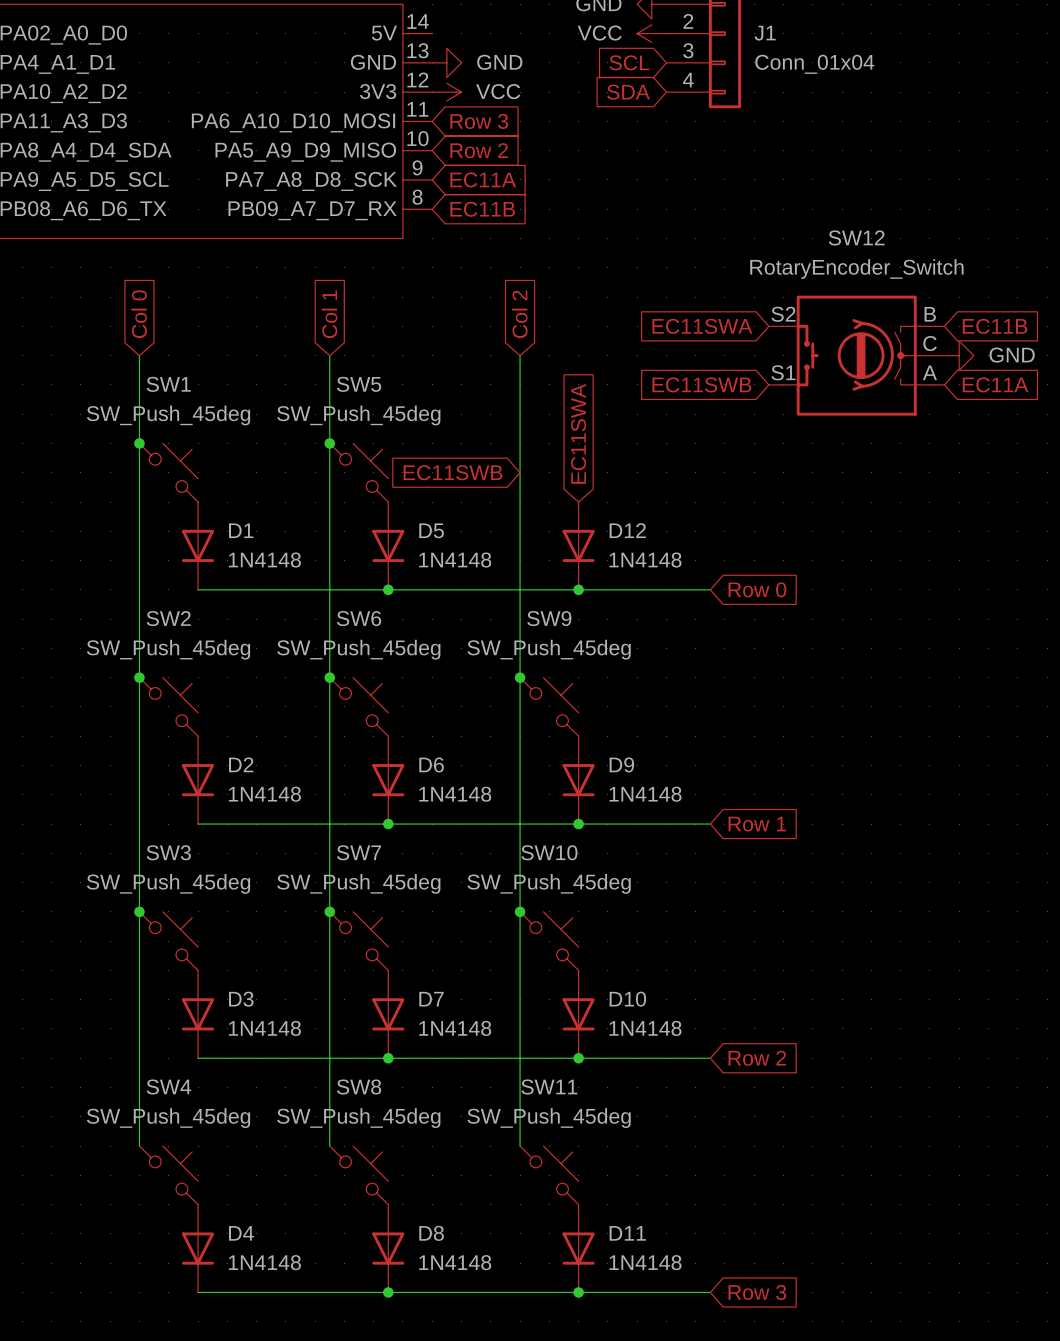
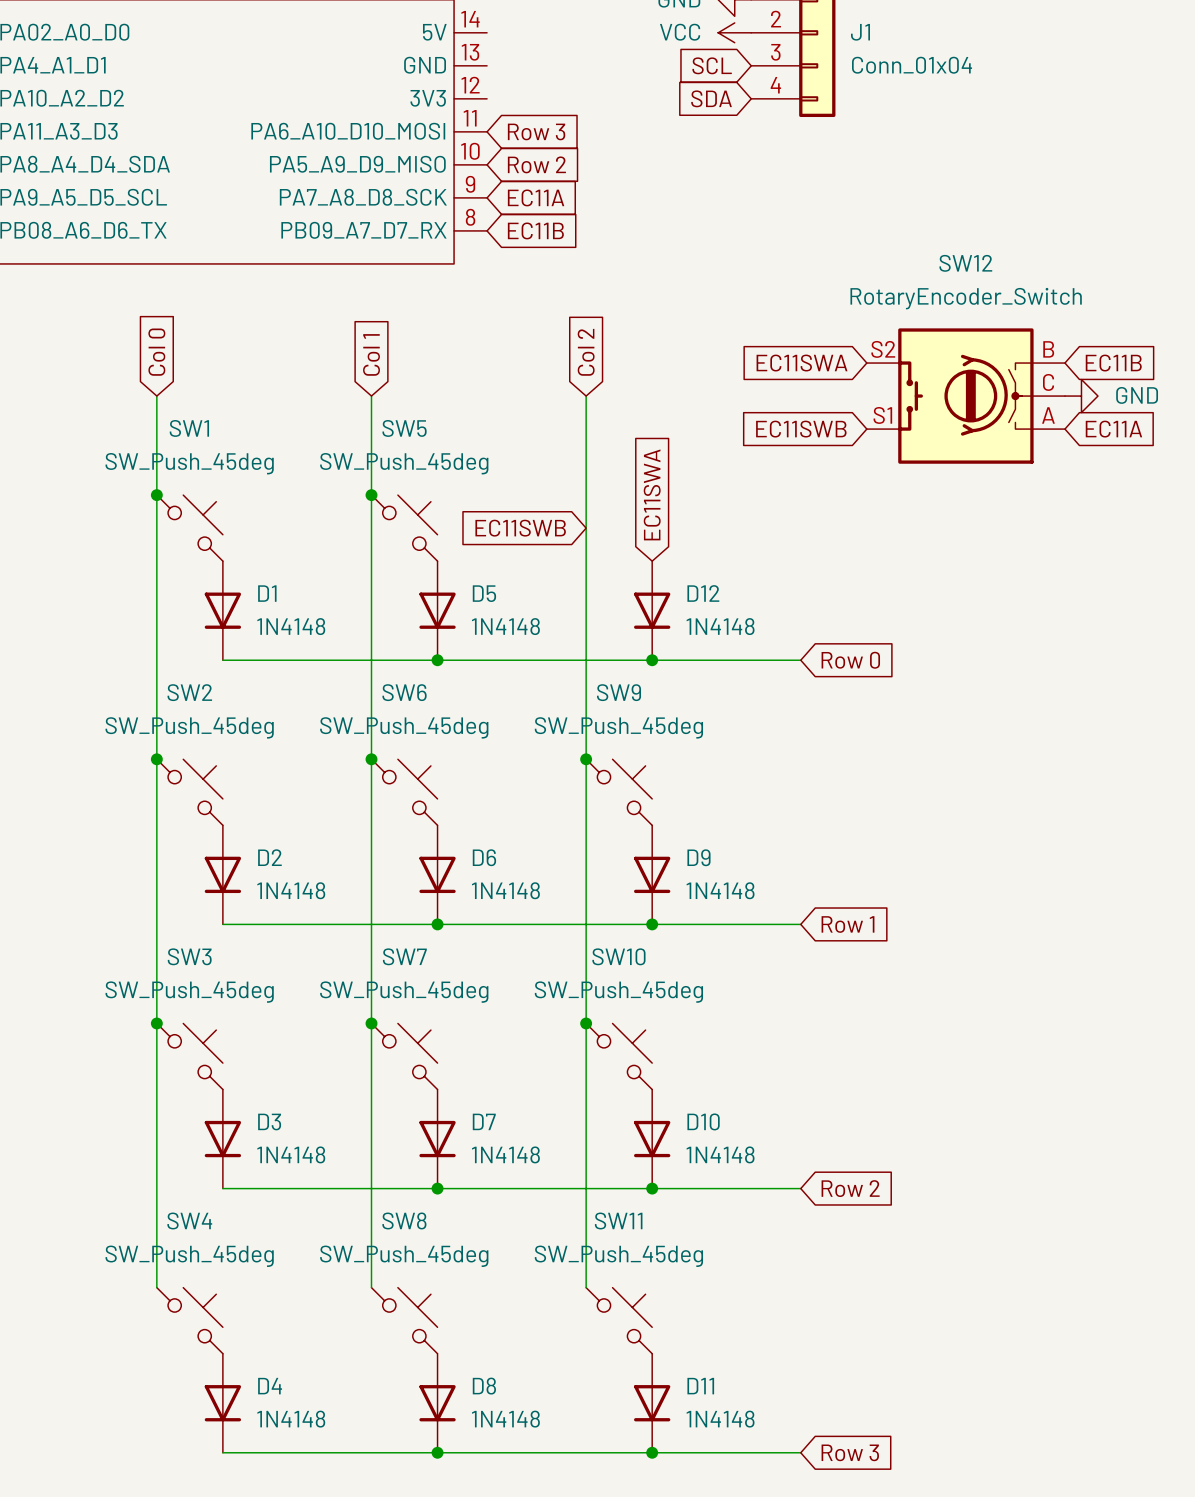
power symbol: GND (446, 62) -> none
power symbol: VCC (446, 92) -> none

